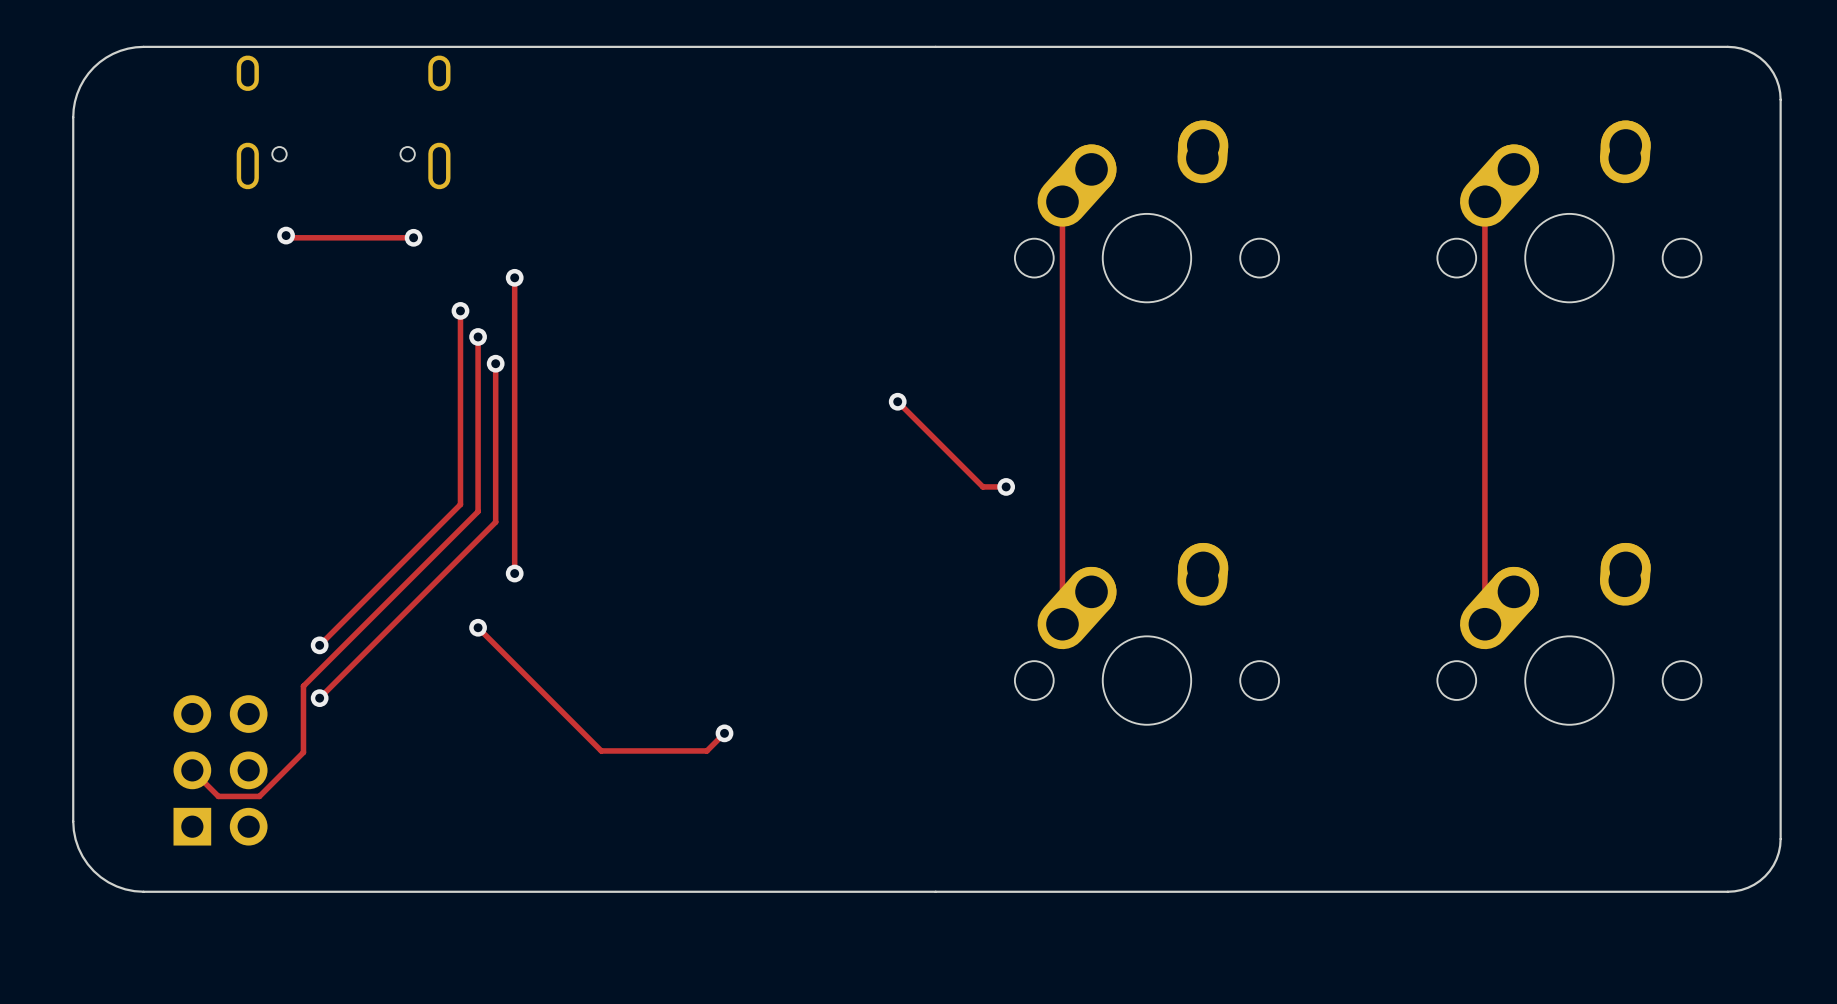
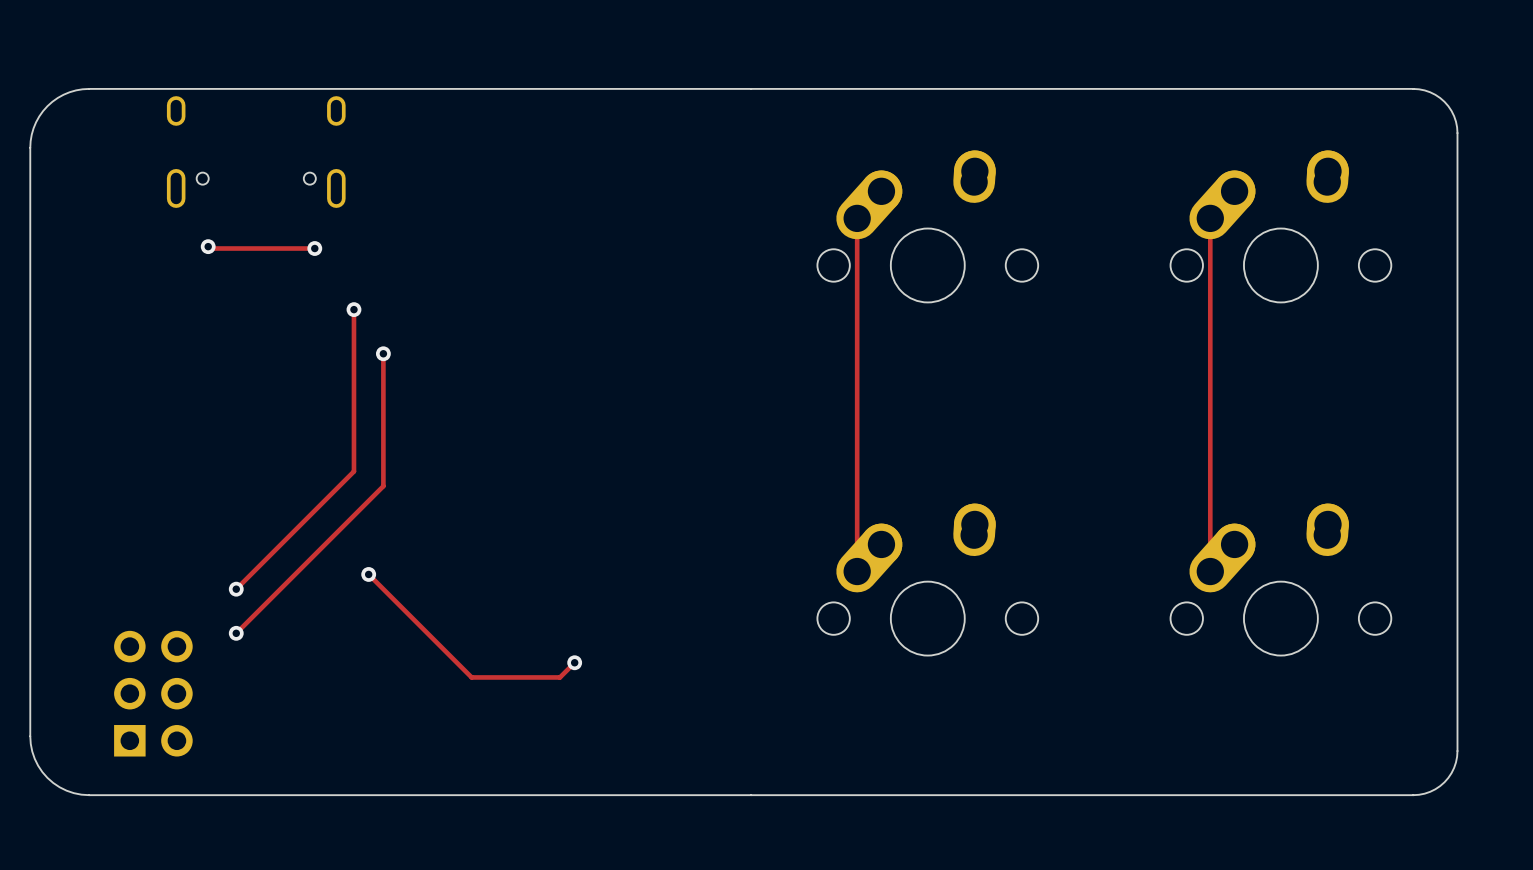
track: (514, 277) (514, 573) -> none
via: (514, 277) -> none
track: (478, 336) (478, 511) (303, 686) (303, 752) (259, 796) (218, 796) (192, 770) -> none
via: (478, 336) -> none
track: (897, 401) (982, 486) (1006, 486) -> none
via: (897, 401) -> none
via: (1006, 486) -> none
via: (514, 573) -> none

